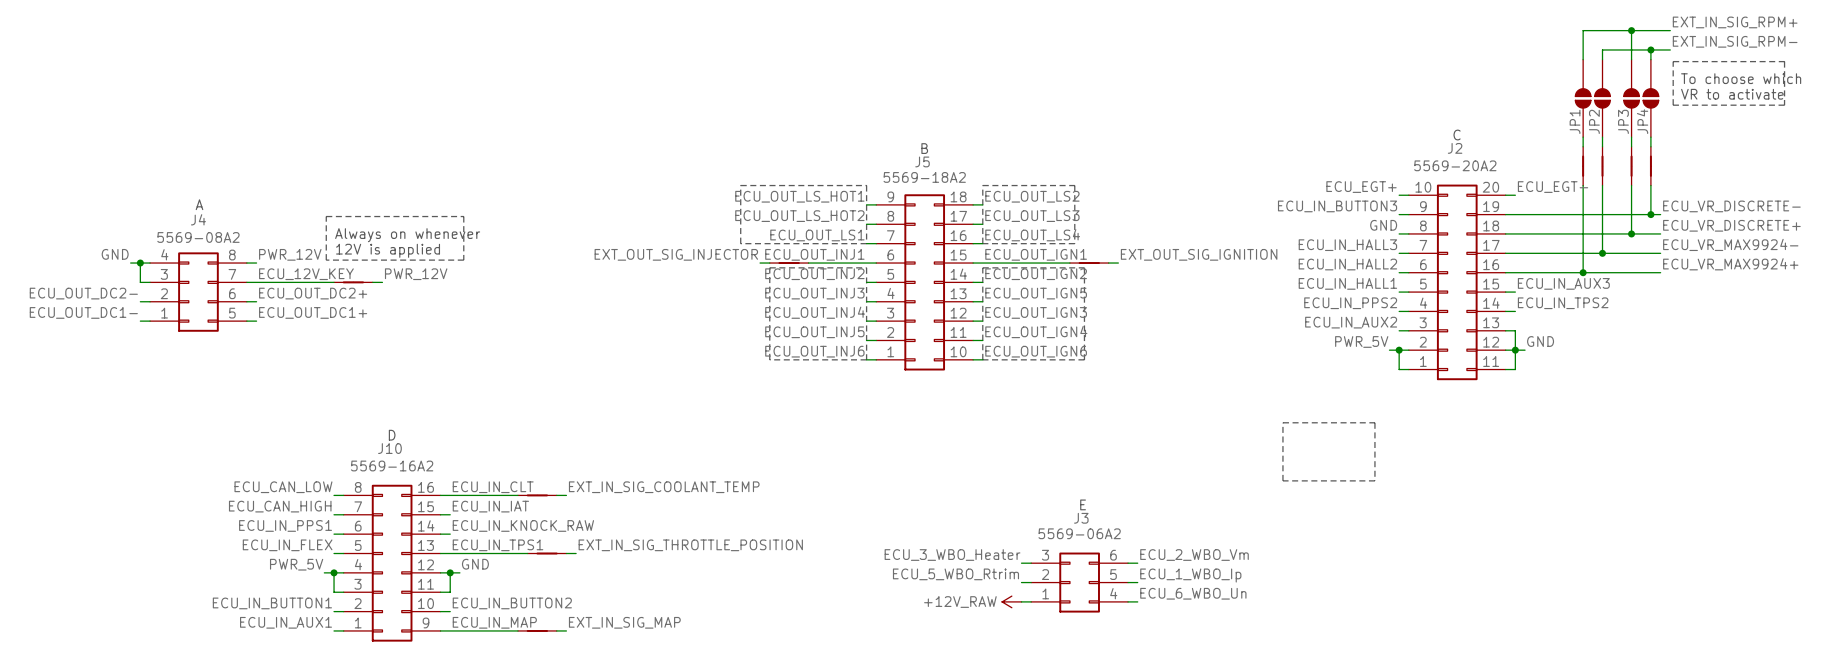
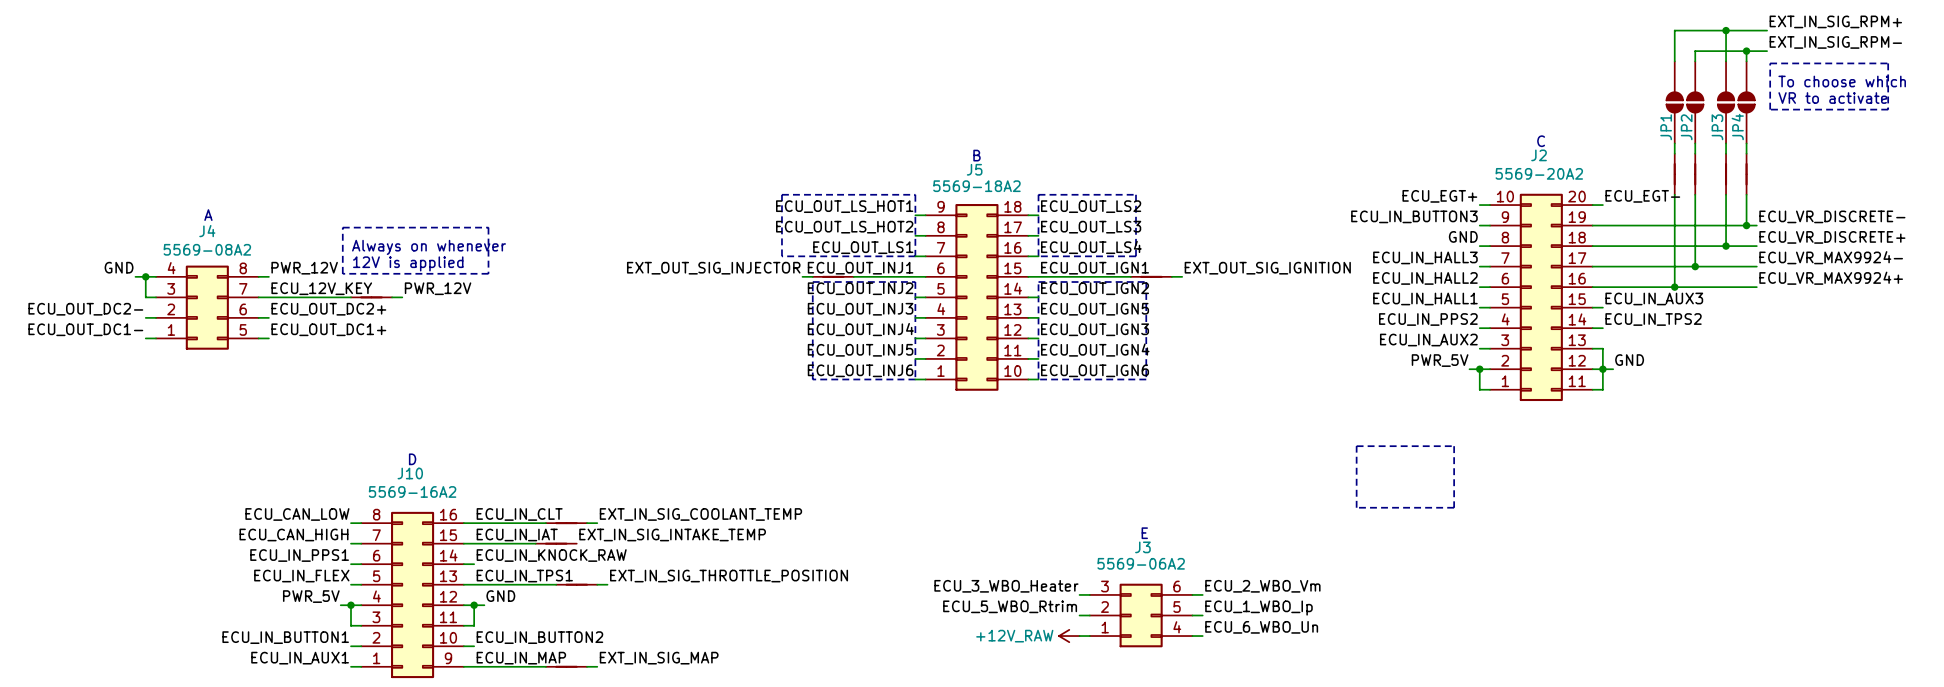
label: none -> EXT_IN_SIG_INTAKE_TEMP (672, 535)
wire: none -> (474, 543) (535, 543)
part: none -> (556, 543)

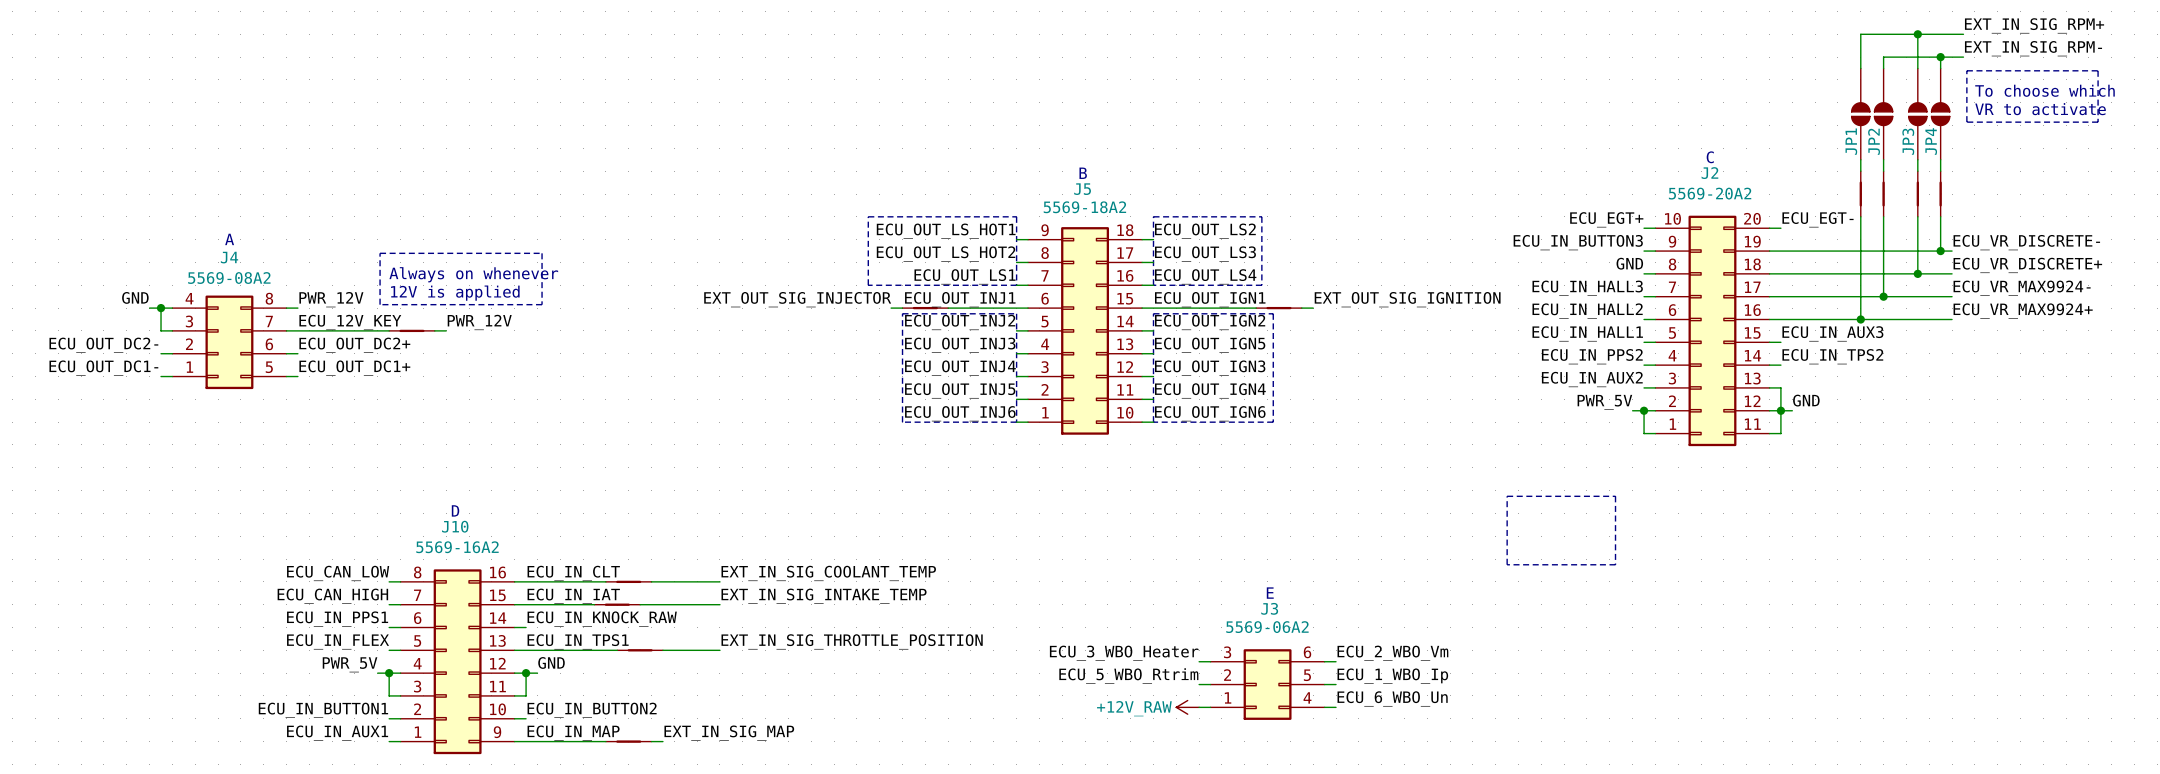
label position: EXT_IN_SIG_COOLANT_TEMP (700, 514) -> EXT_IN_SIG_COOLANT_TEMP (828, 573)
wire: none -> (662, 581) (719, 581)
label position: EXT_IN_SIG_INTAKE_TEMP (672, 535) -> EXT_IN_SIG_INTAKE_TEMP (824, 596)
wire: none -> (640, 604) (719, 604)
label position: EXT_IN_SIG_THROTTLE_POSITION (729, 576) -> EXT_IN_SIG_THROTTLE_POSITION (852, 641)
wire: none -> (674, 650) (719, 650)

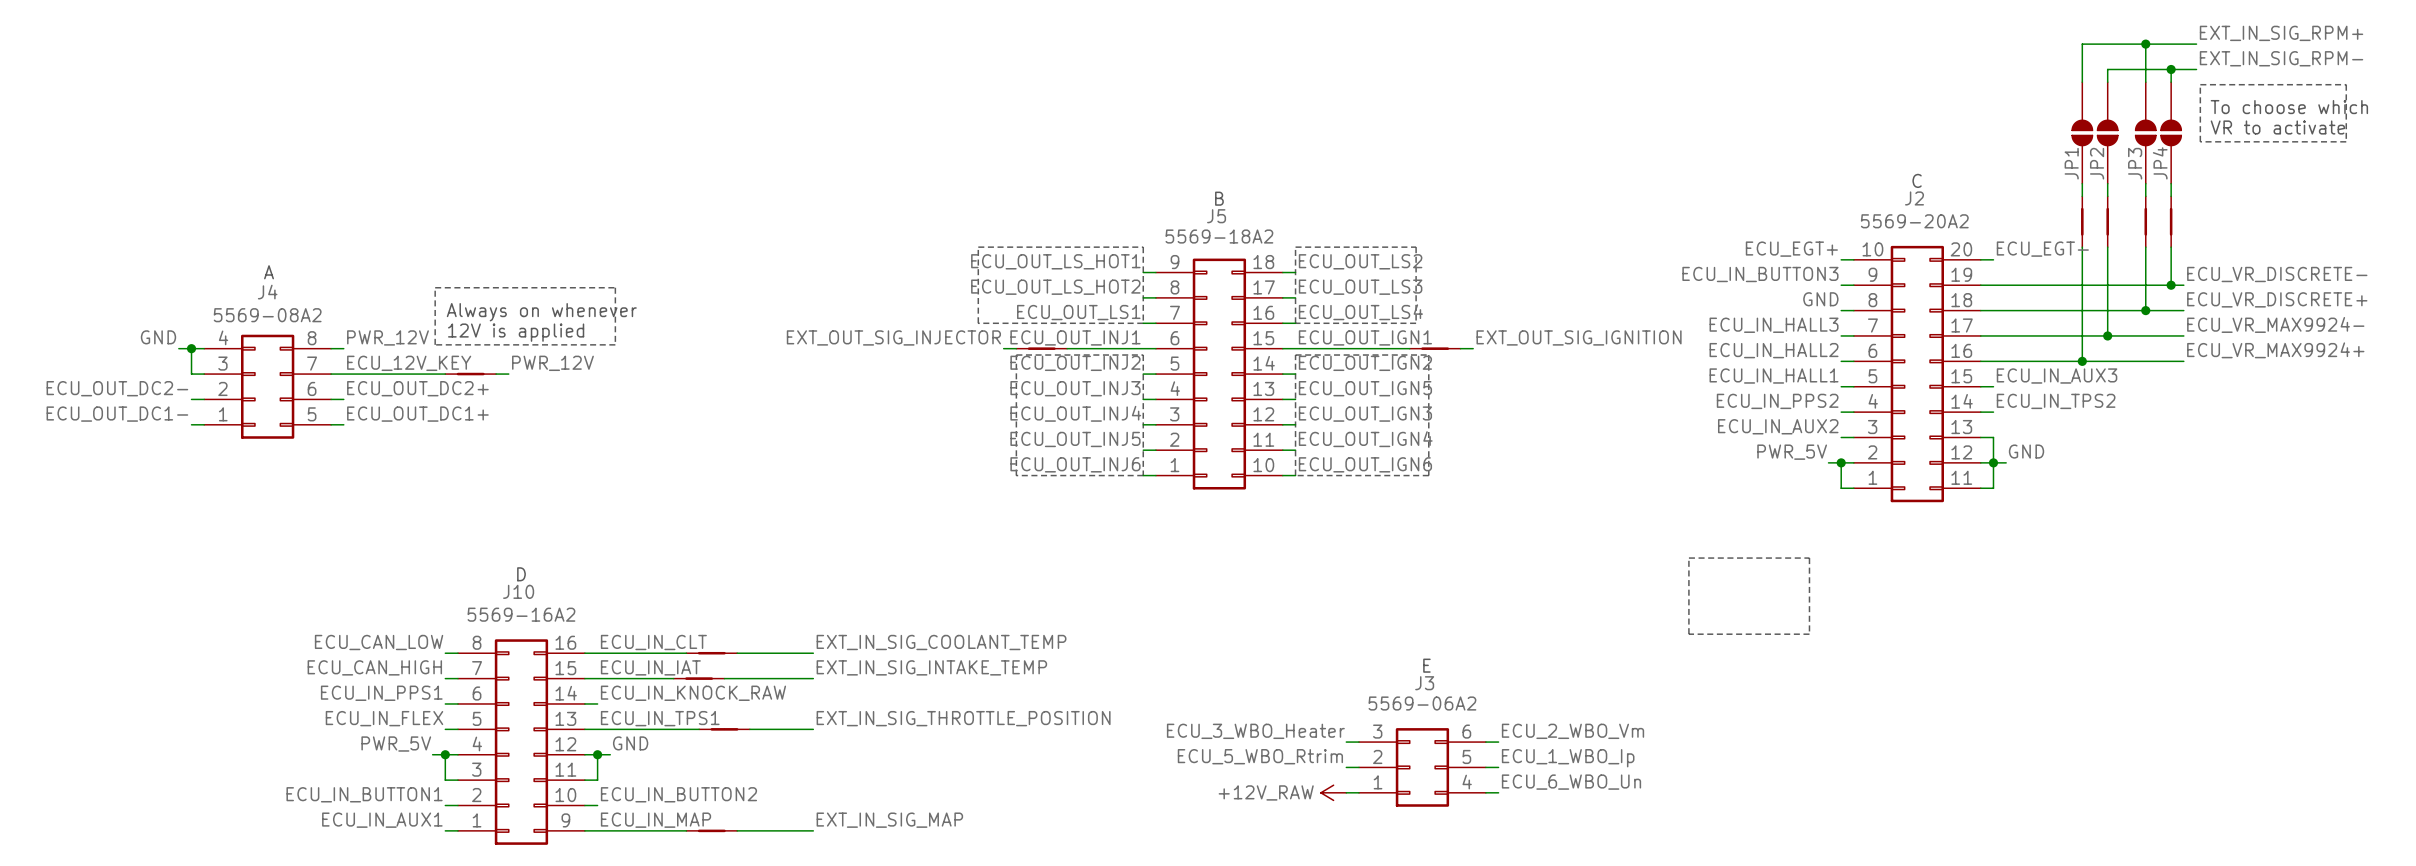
label position: EXT_IN_SIG_MAP (729, 733) -> EXT_IN_SIG_MAP (889, 820)
wire: none -> (749, 830) (813, 830)

